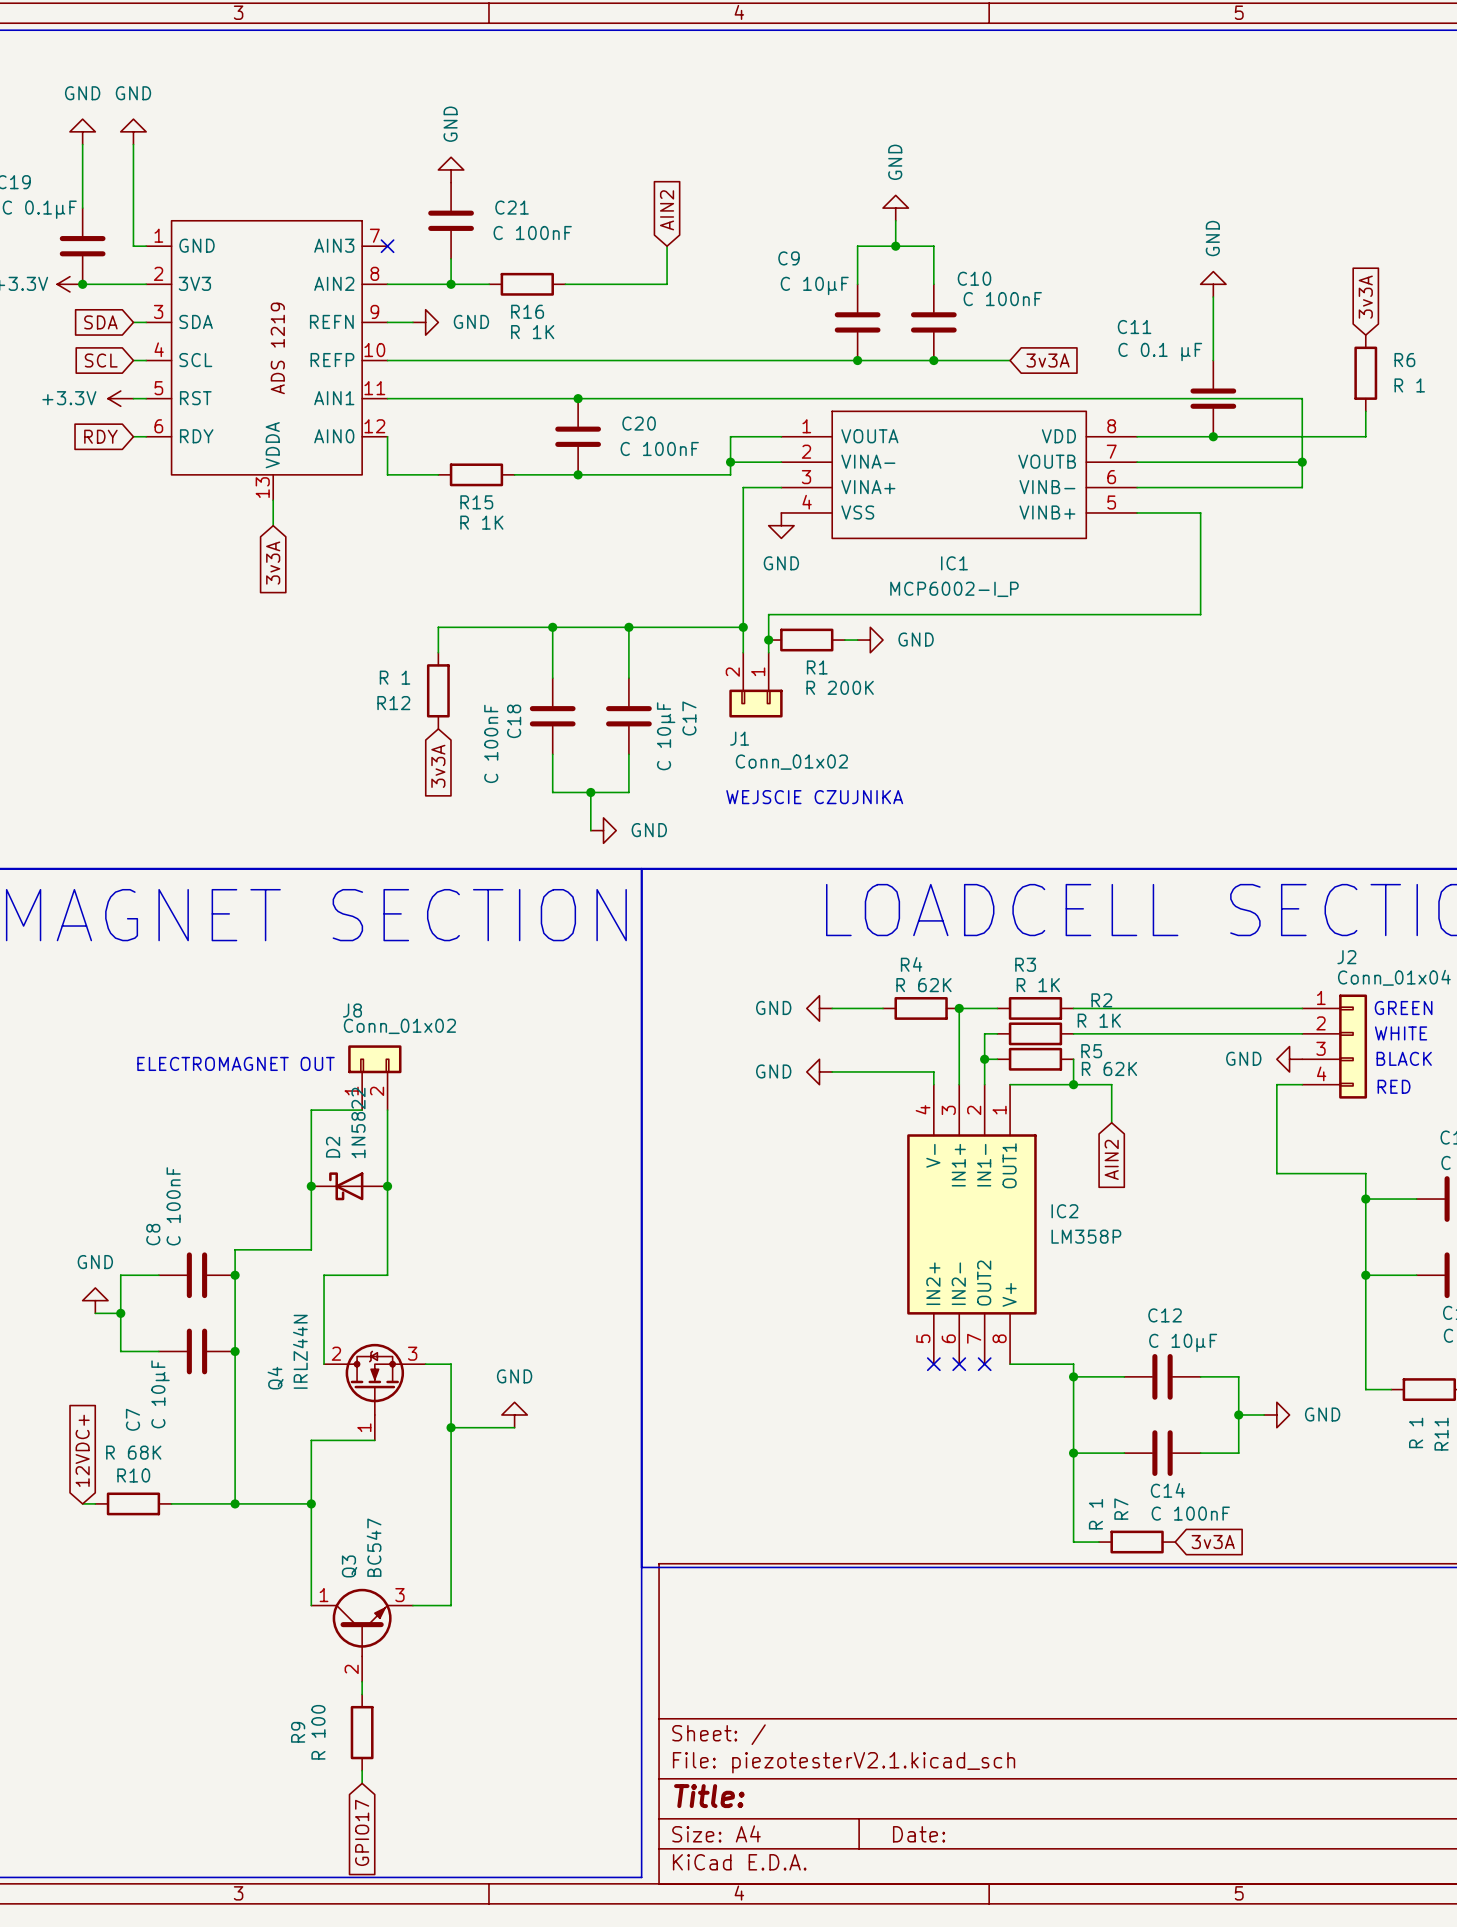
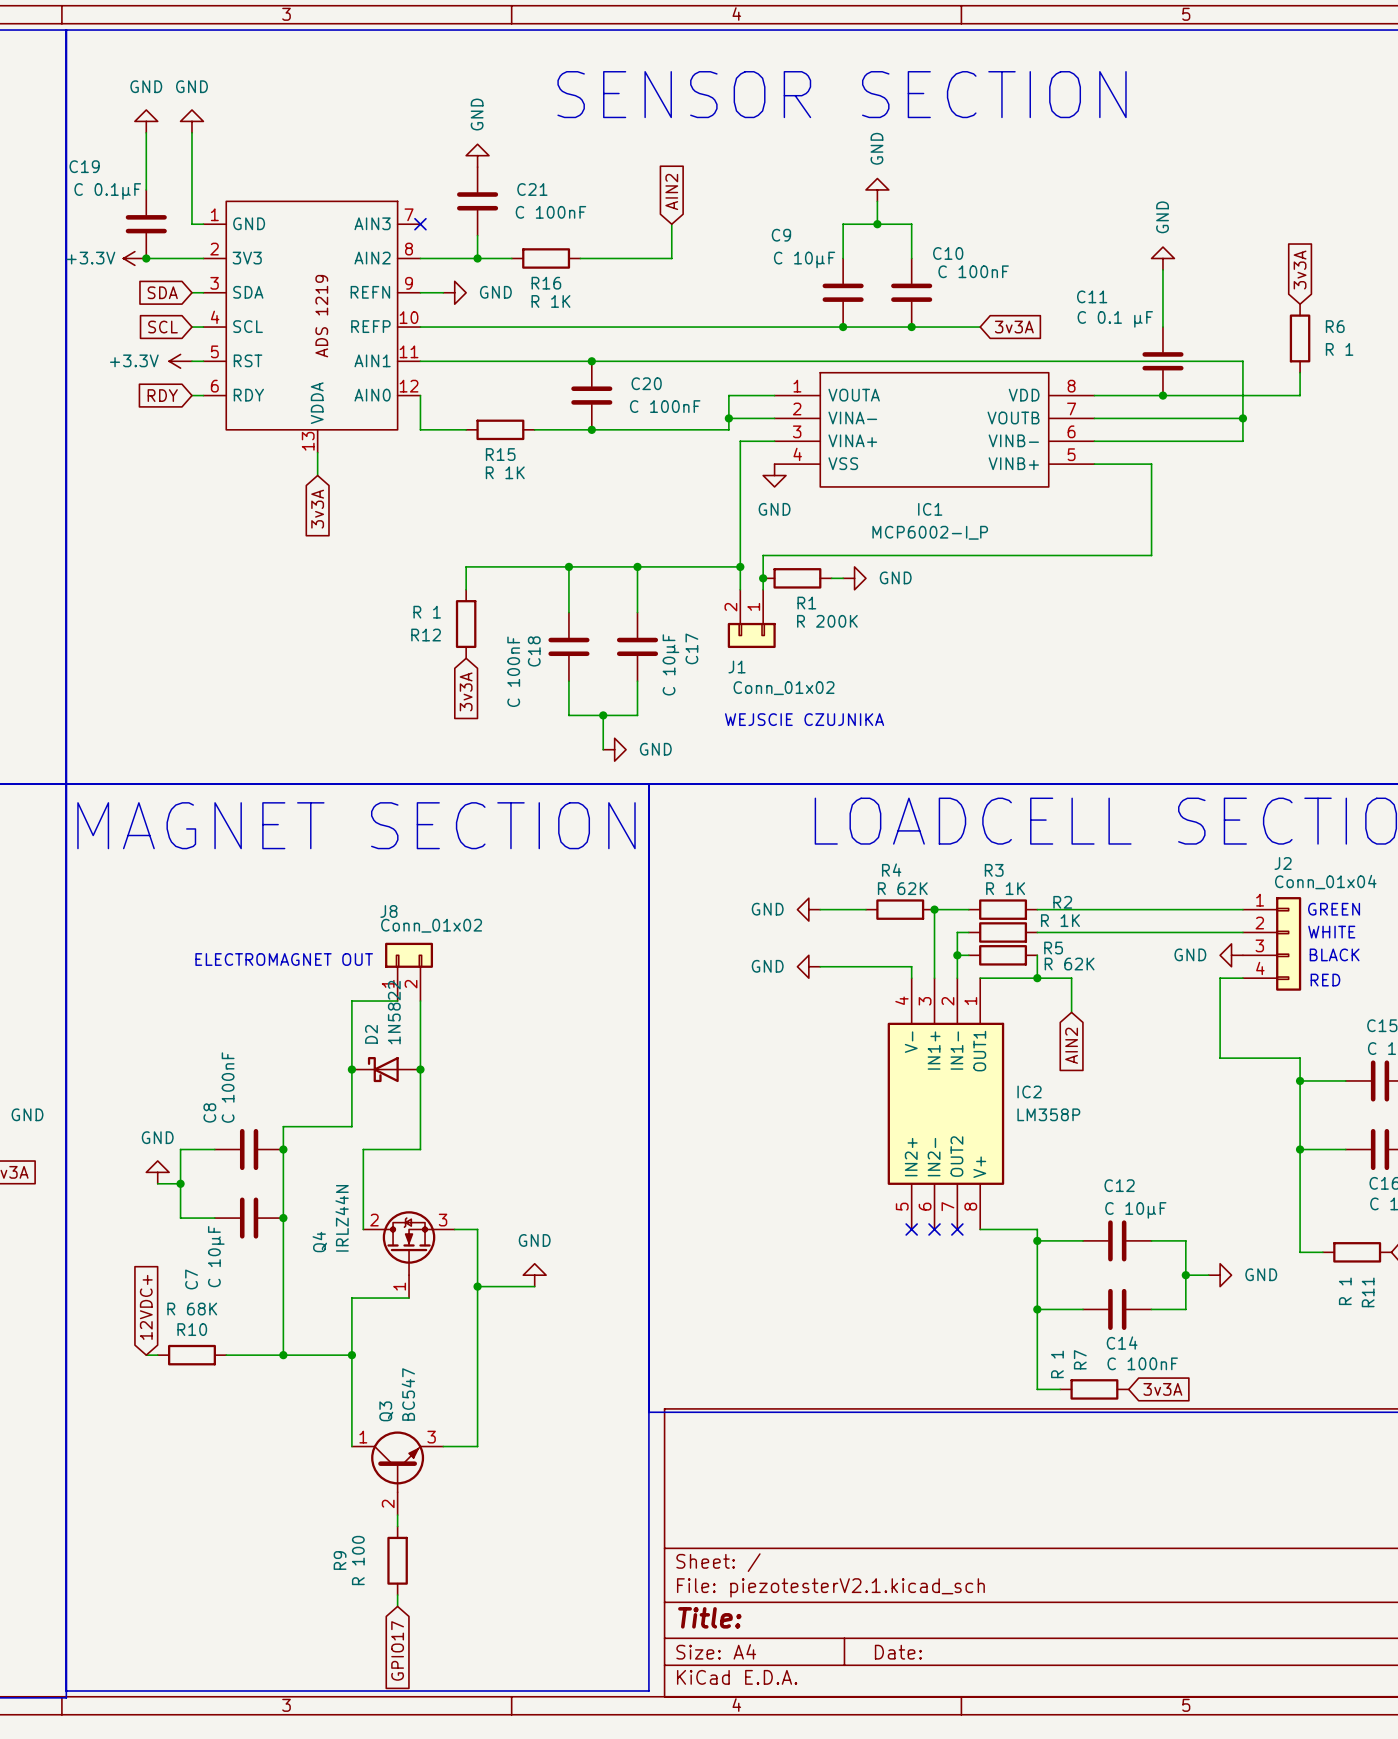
text: none -> SENSOR SECTION (842, 94)

